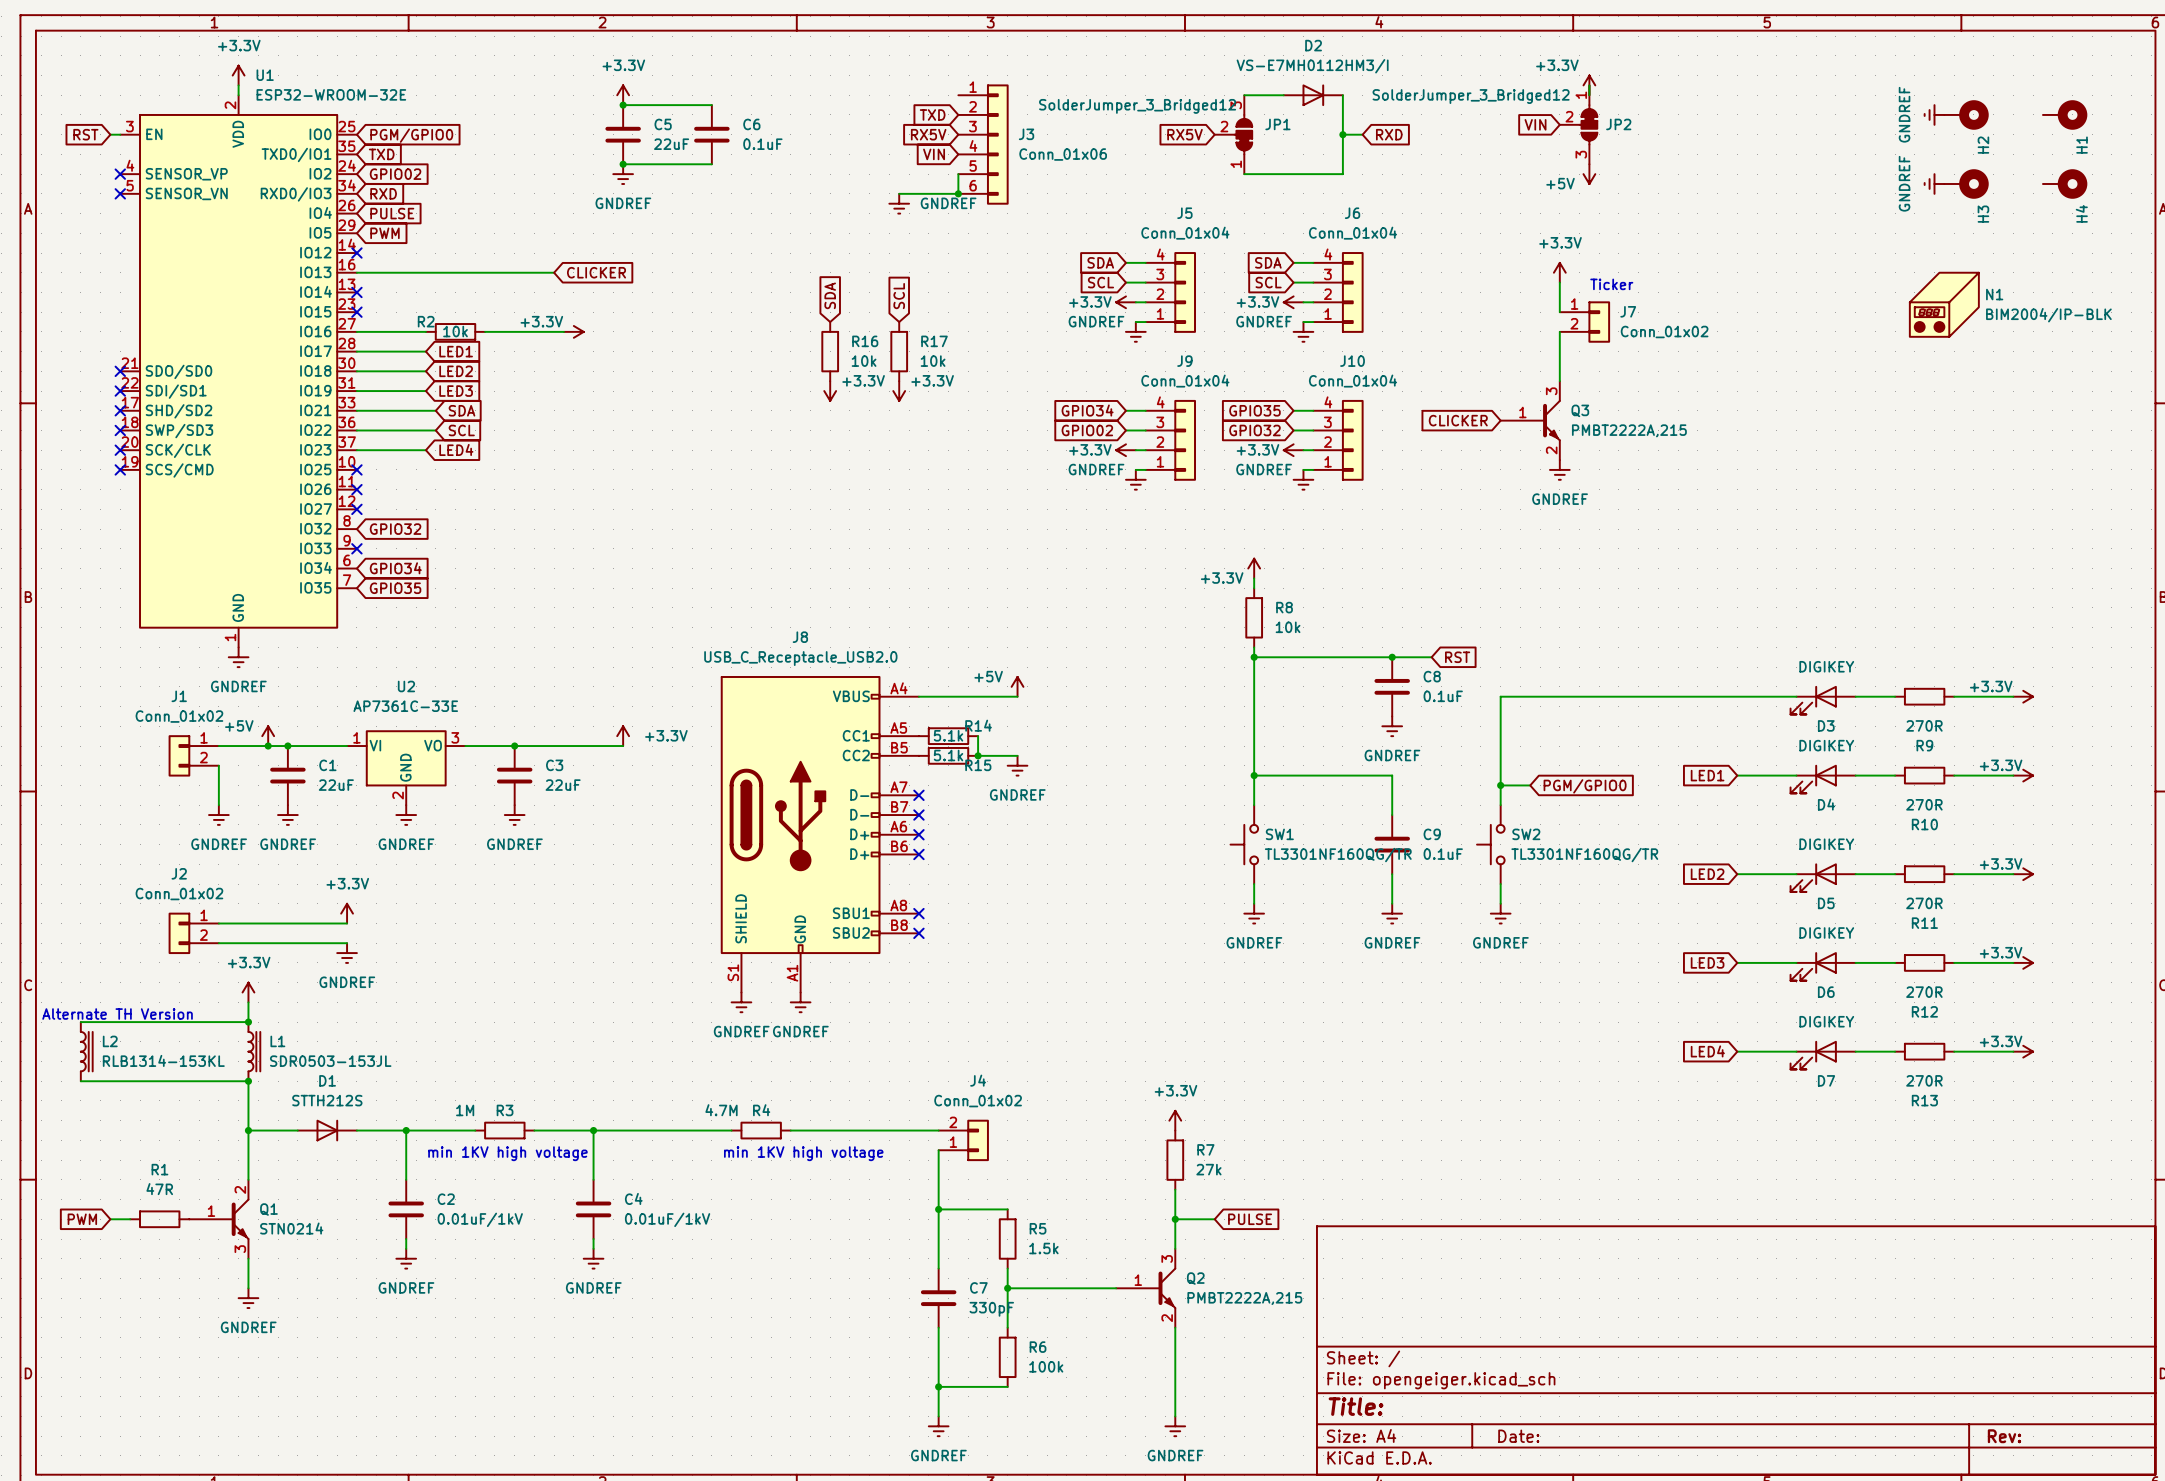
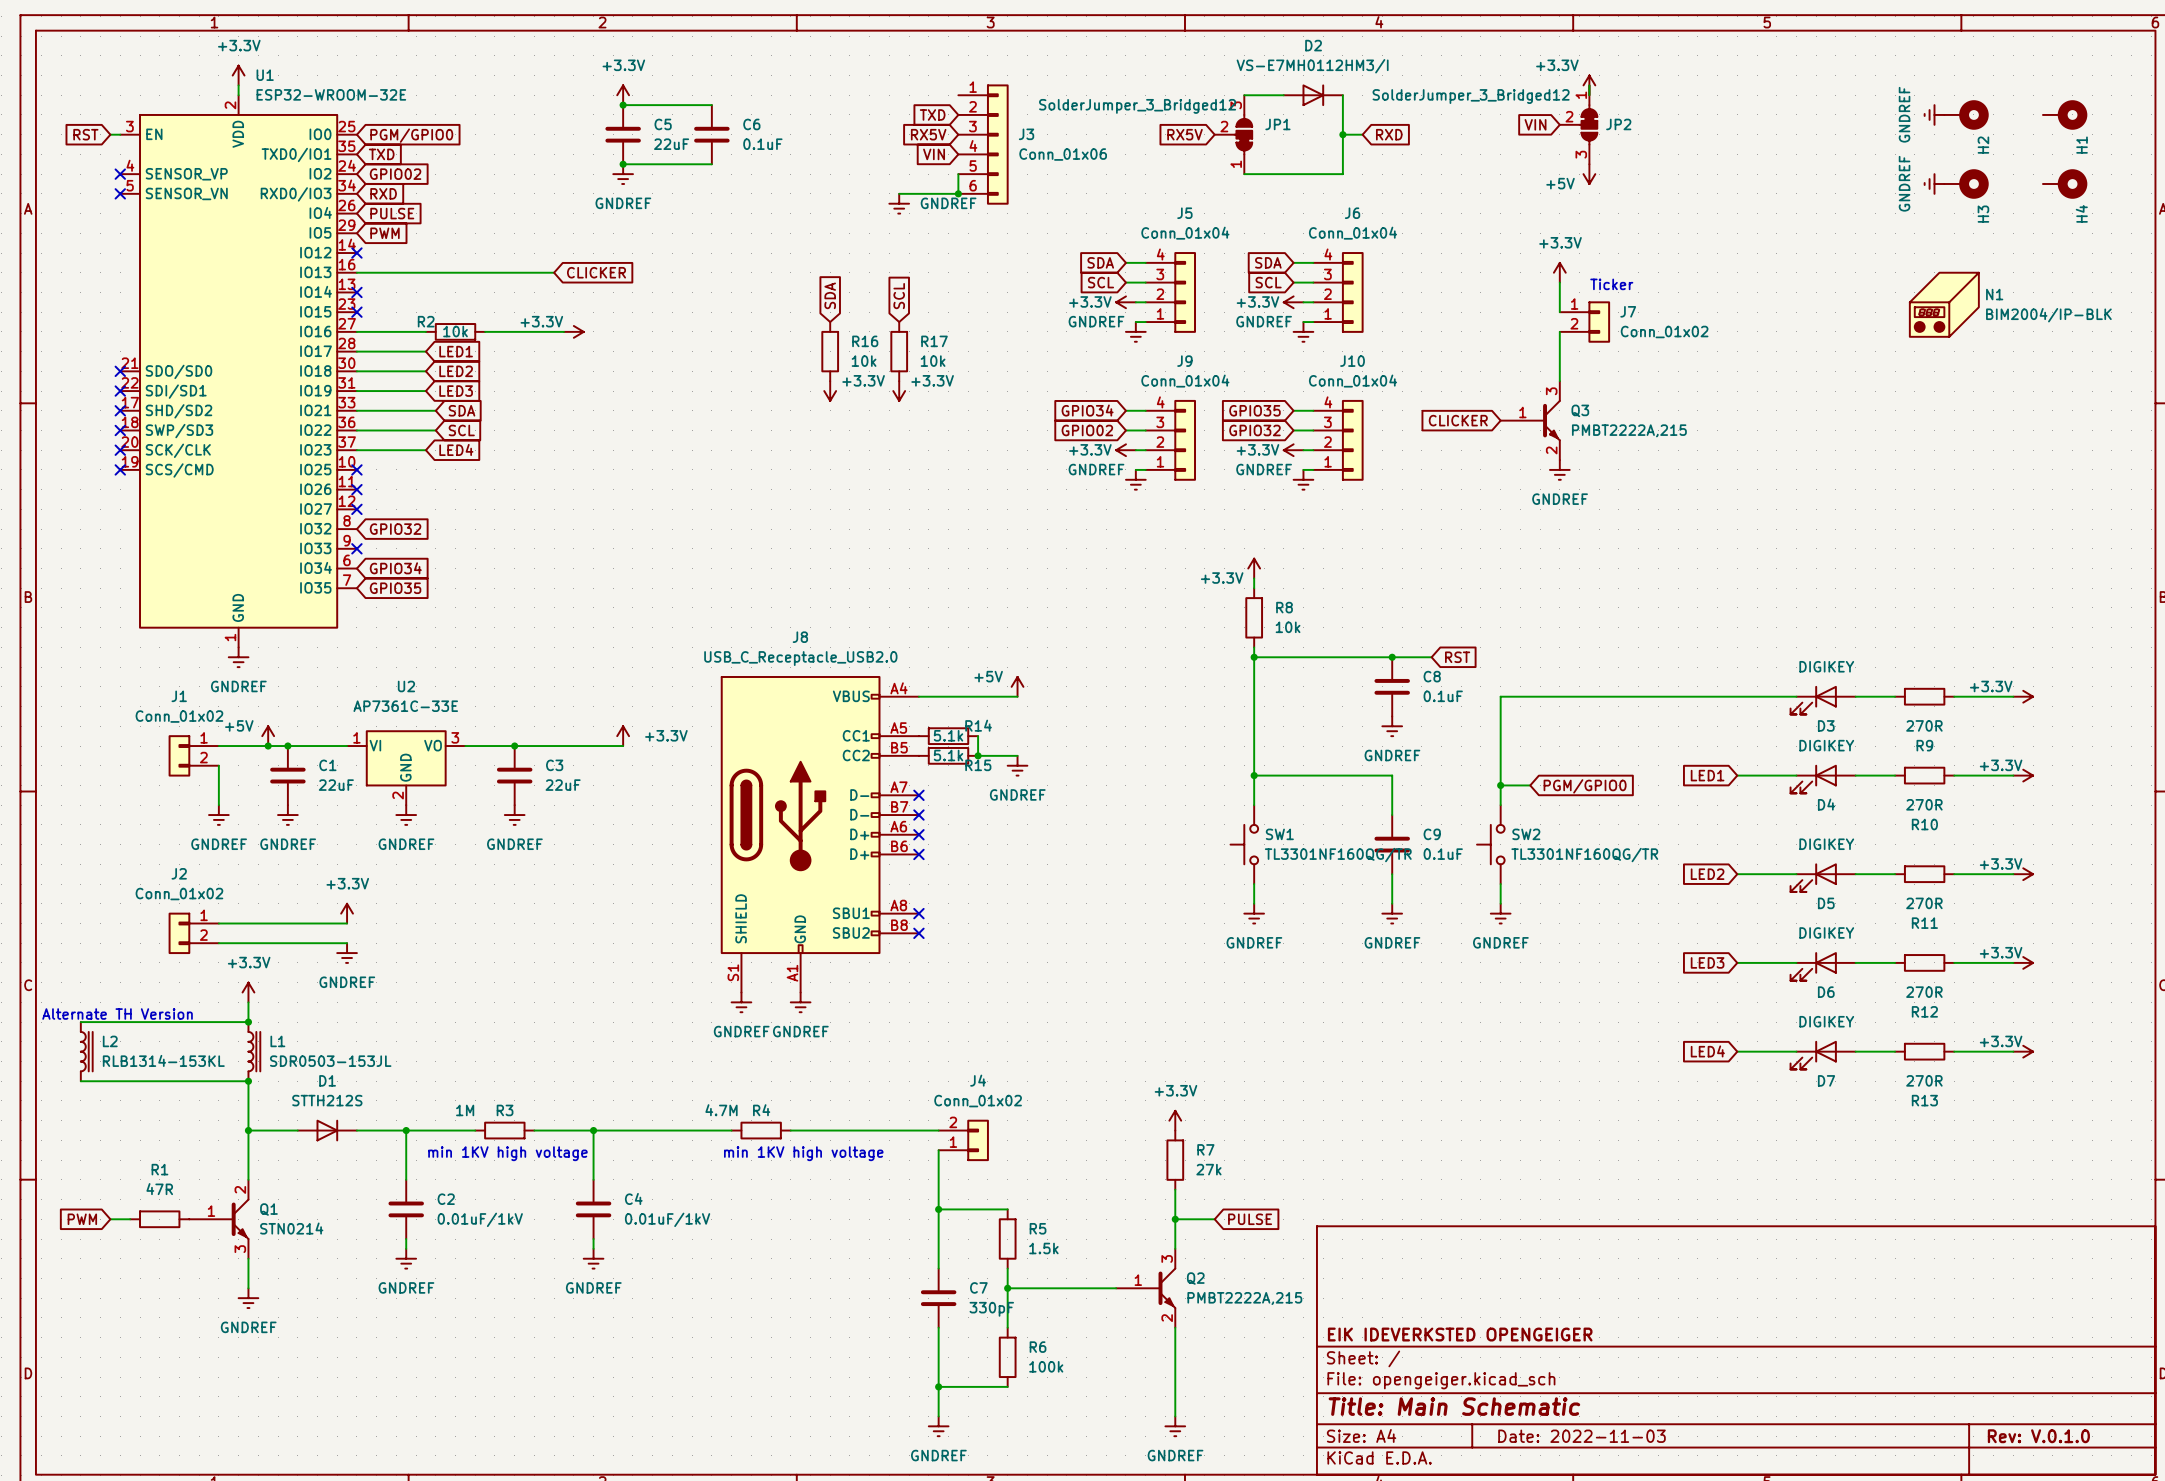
title block: none -> EIK IDEVERKSTED OPENGEIGER (1460, 1334)
title block: Title: (1356, 1406) -> Title: Main Schematic (1454, 1406)
title block: Date: (1518, 1436) -> Date: 2022-11-03 (1582, 1436)
title block: Rev: (2004, 1436) -> Rev: V.0.1.0 (2038, 1436)

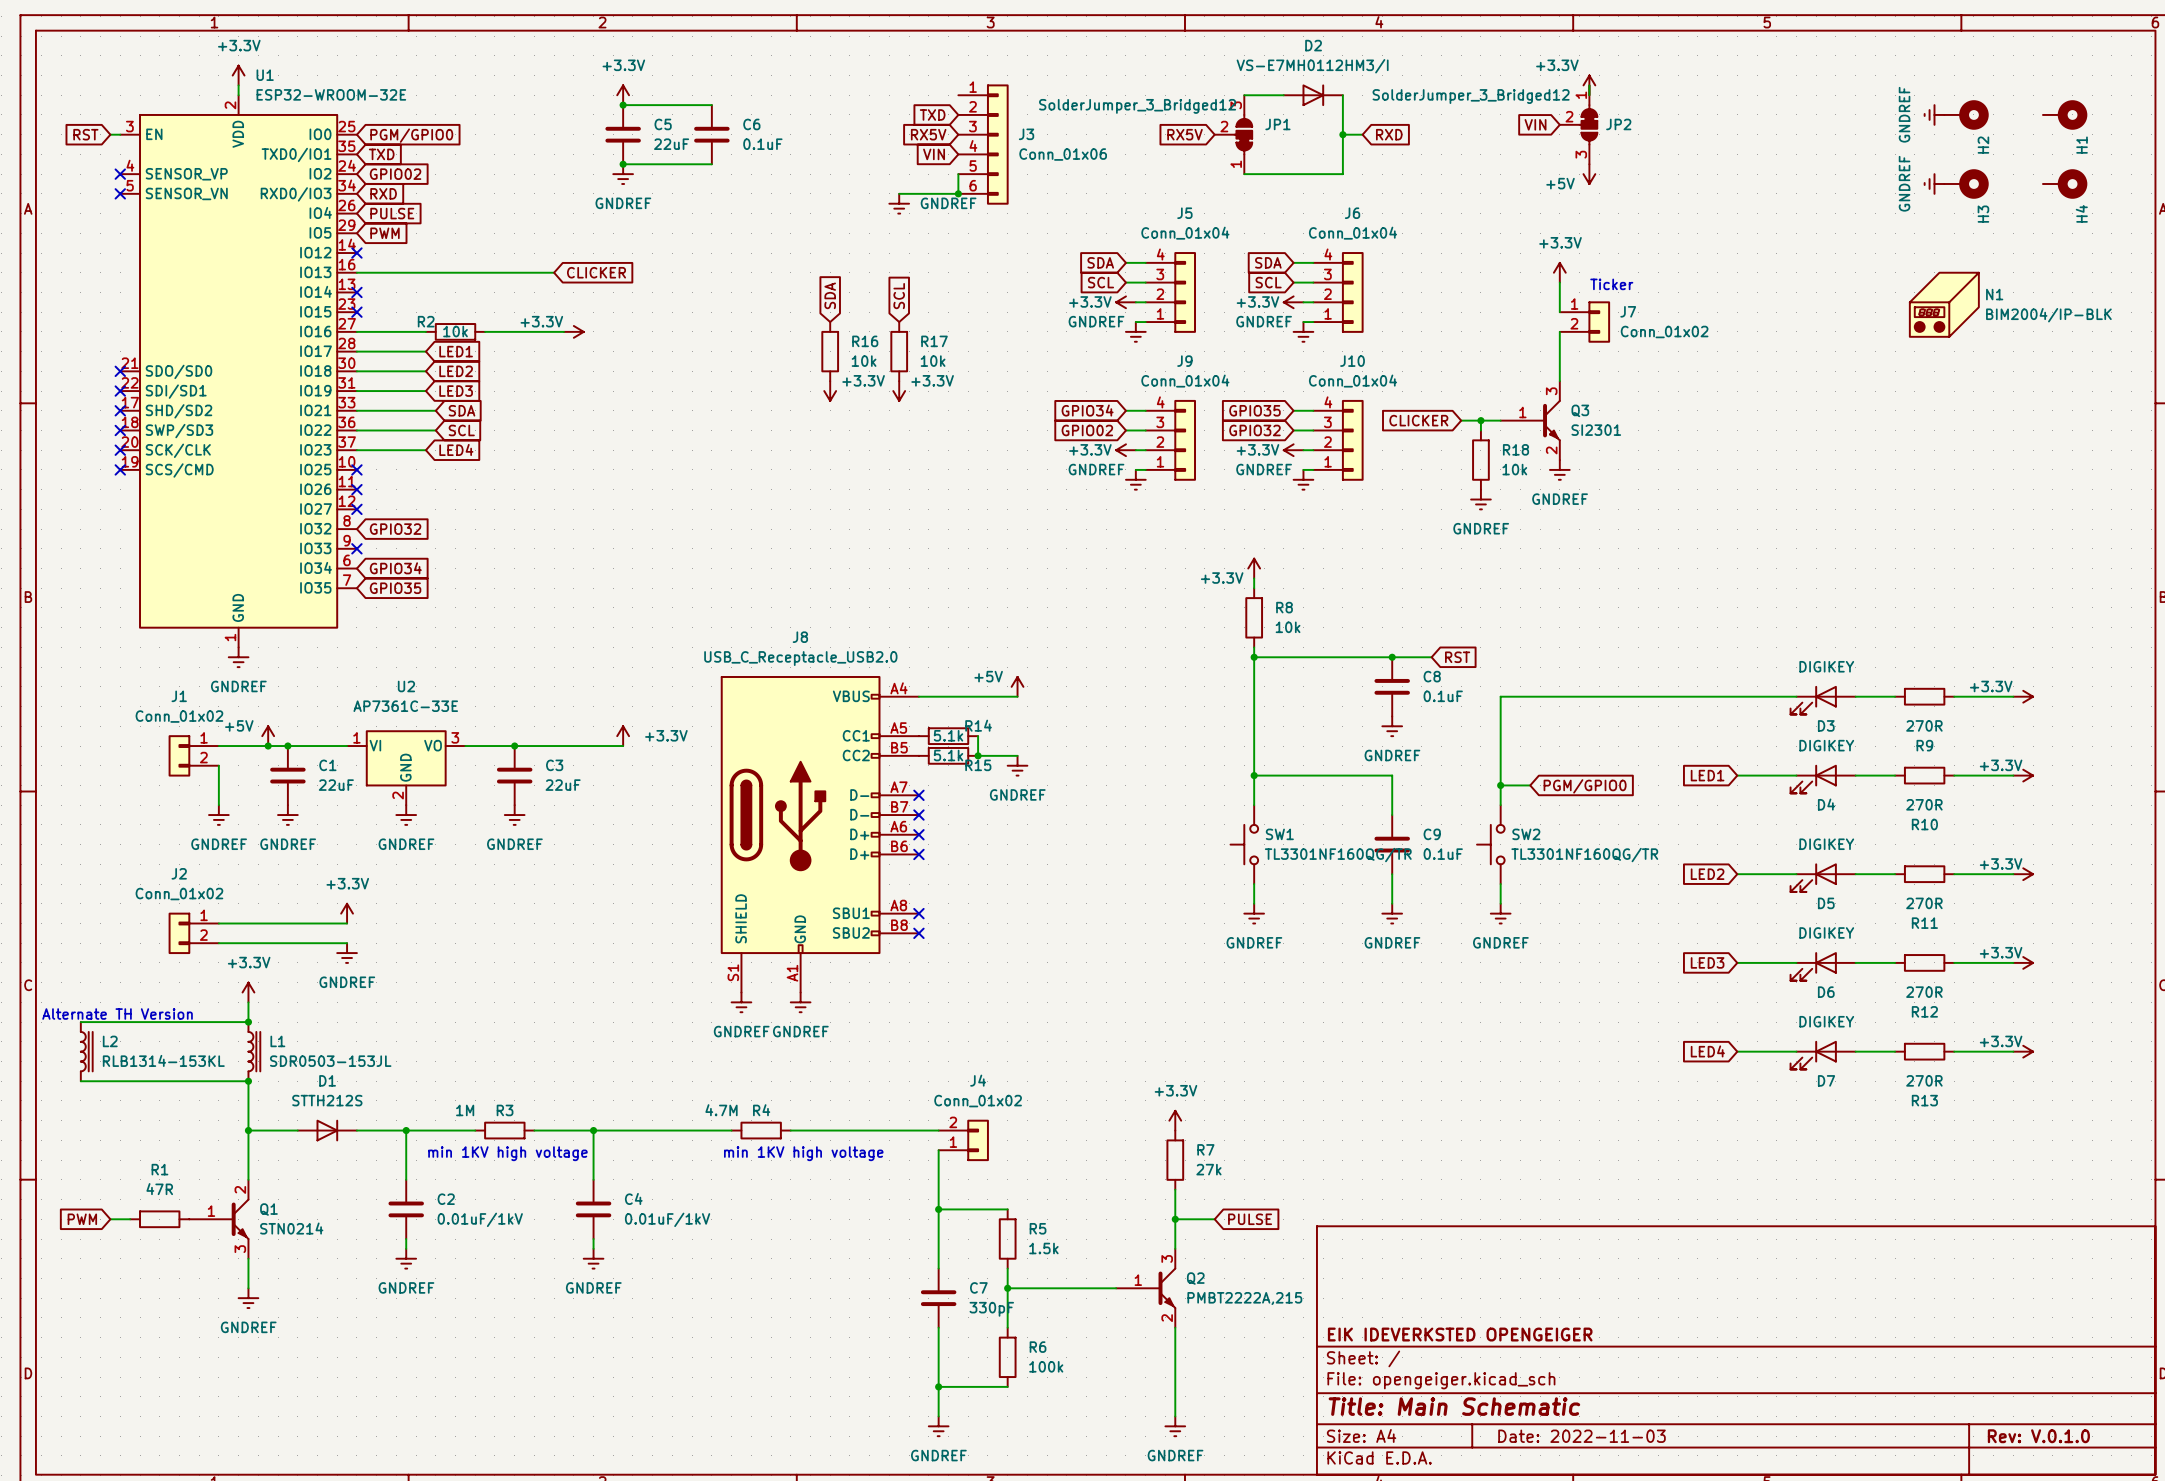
global label position: CLICKER (1458, 420) -> CLICKER (1418, 420)
wire: none -> (1461, 420) (1500, 420)
junction: none -> (1480, 420)
Q3 value: PMBT2222A,215 (1629, 430) -> SI2301 (1596, 430)
R18: none -> 10k (1480, 460)
power symbol: none -> GNDREF (1480, 499)

